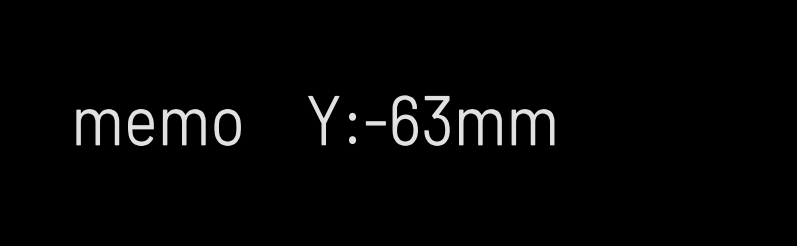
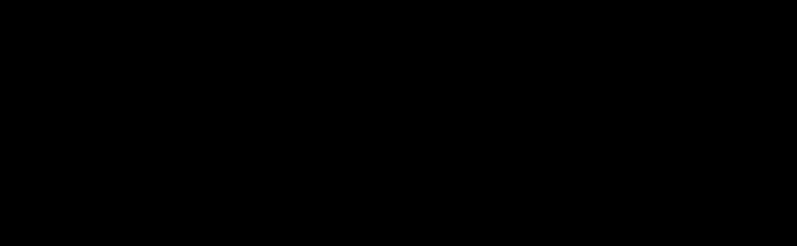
text: memo Y:-63mm (315, 120) -> none

